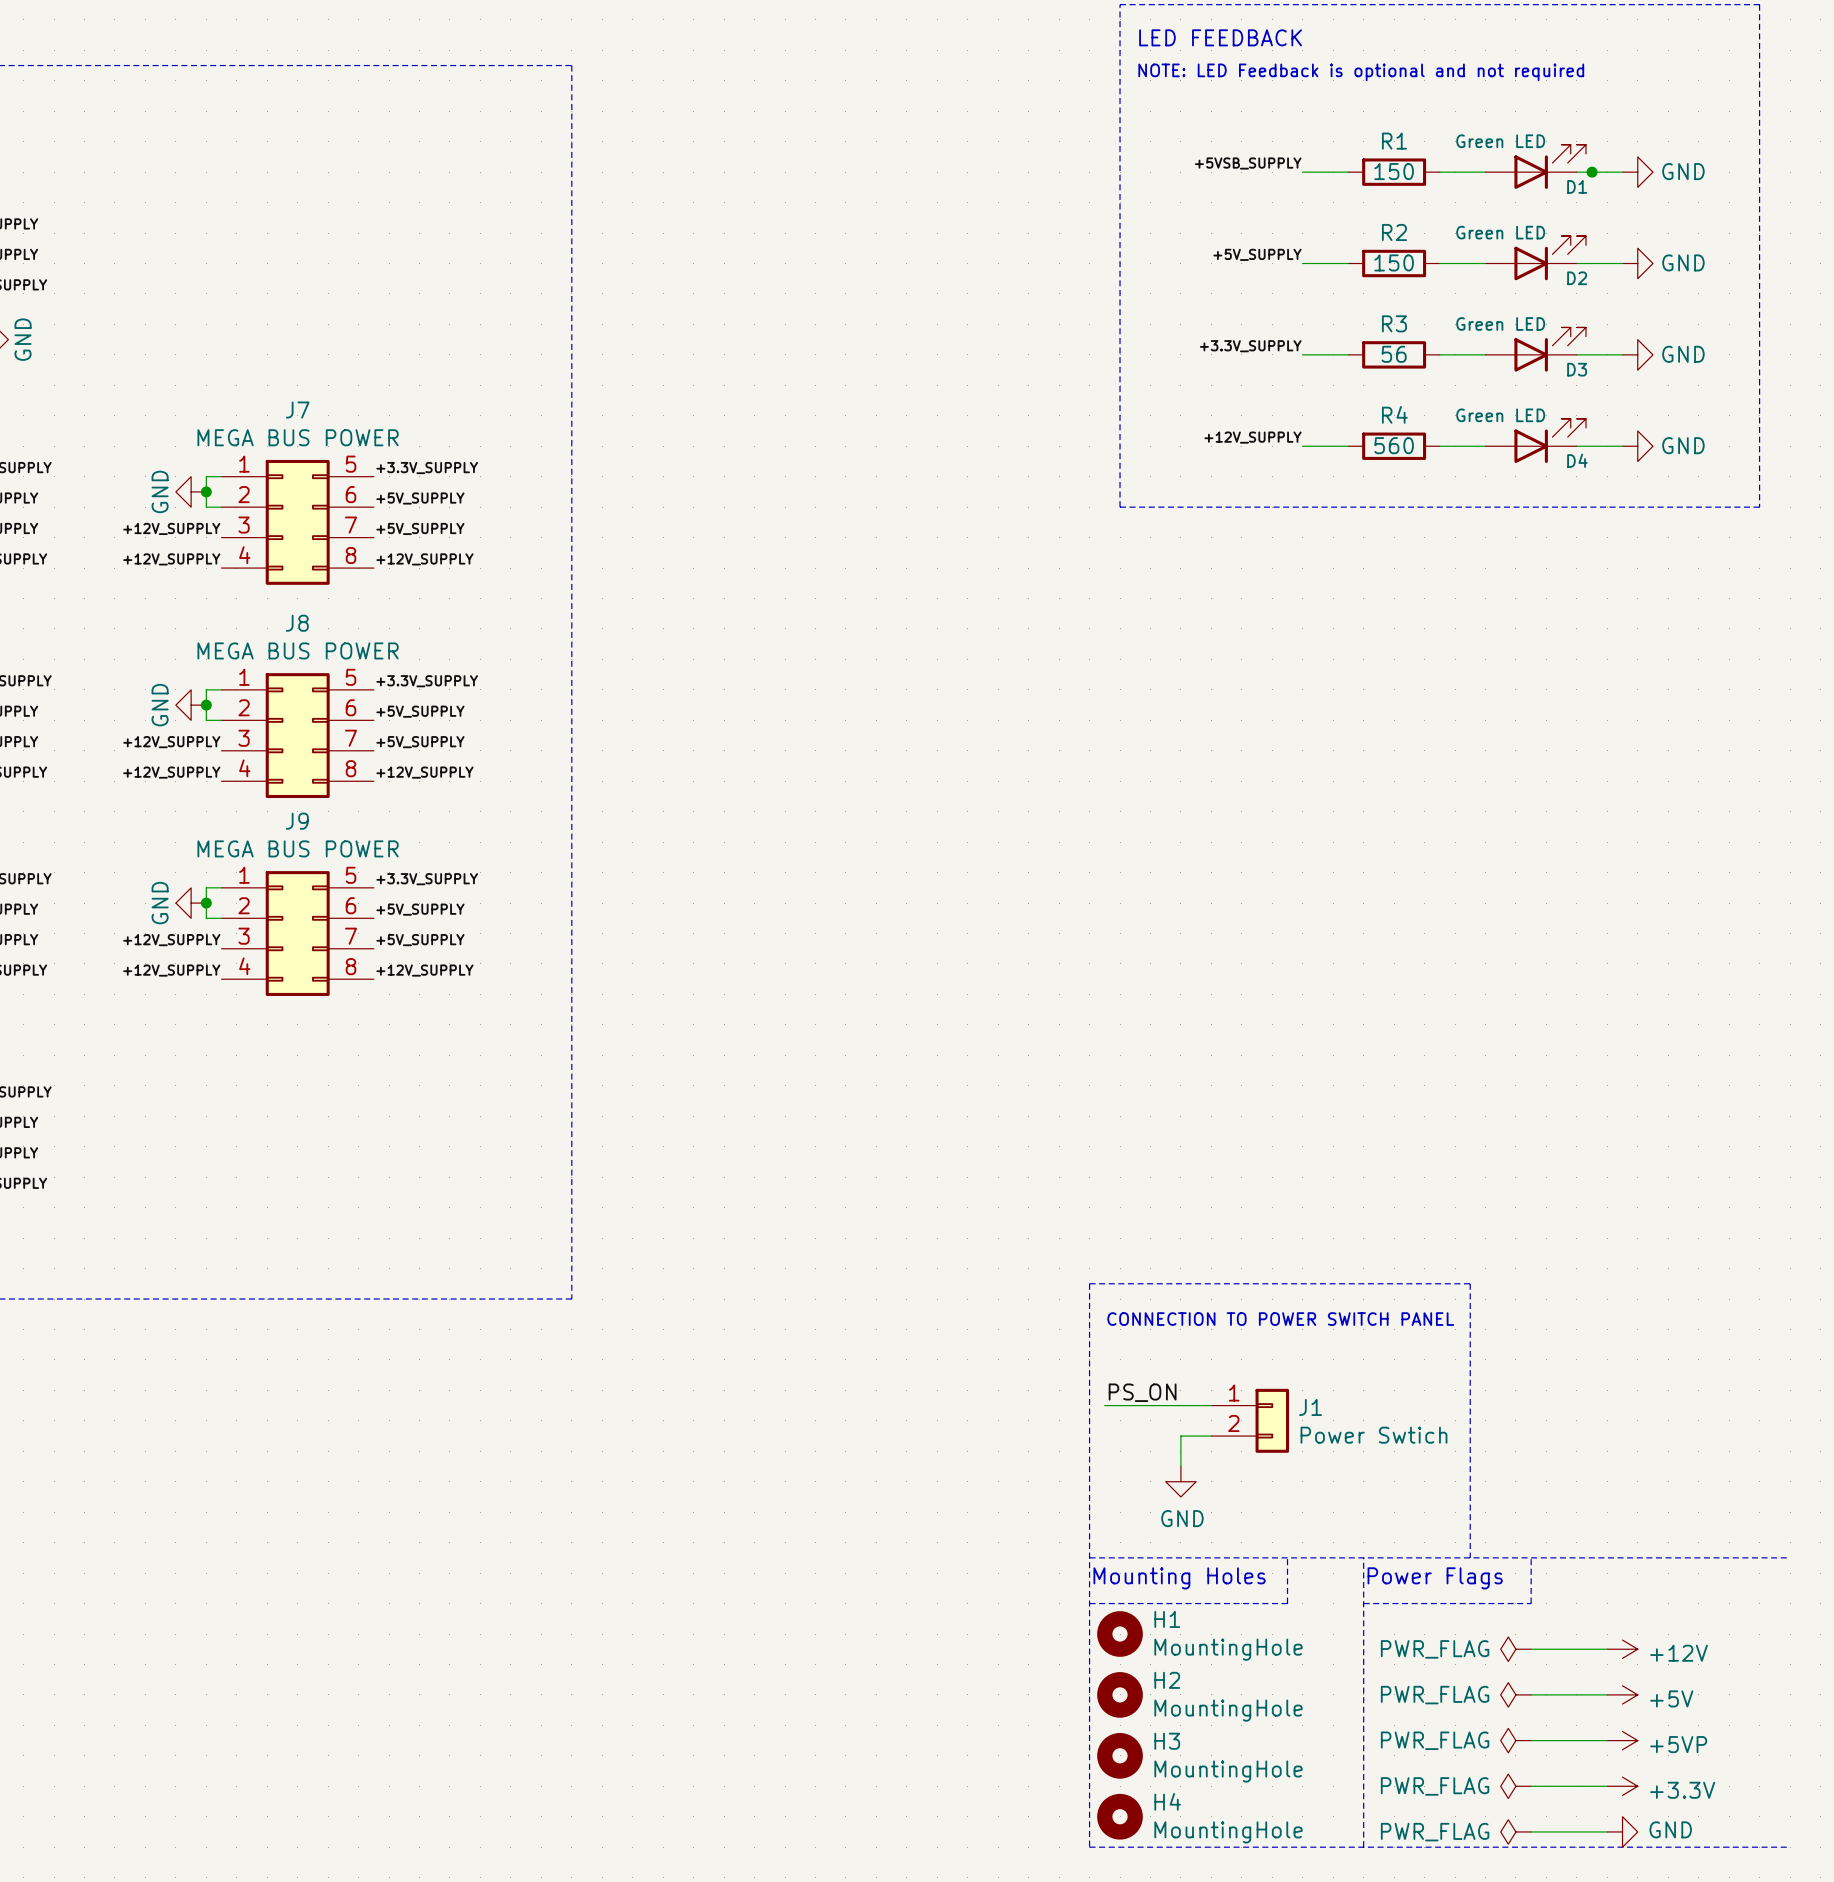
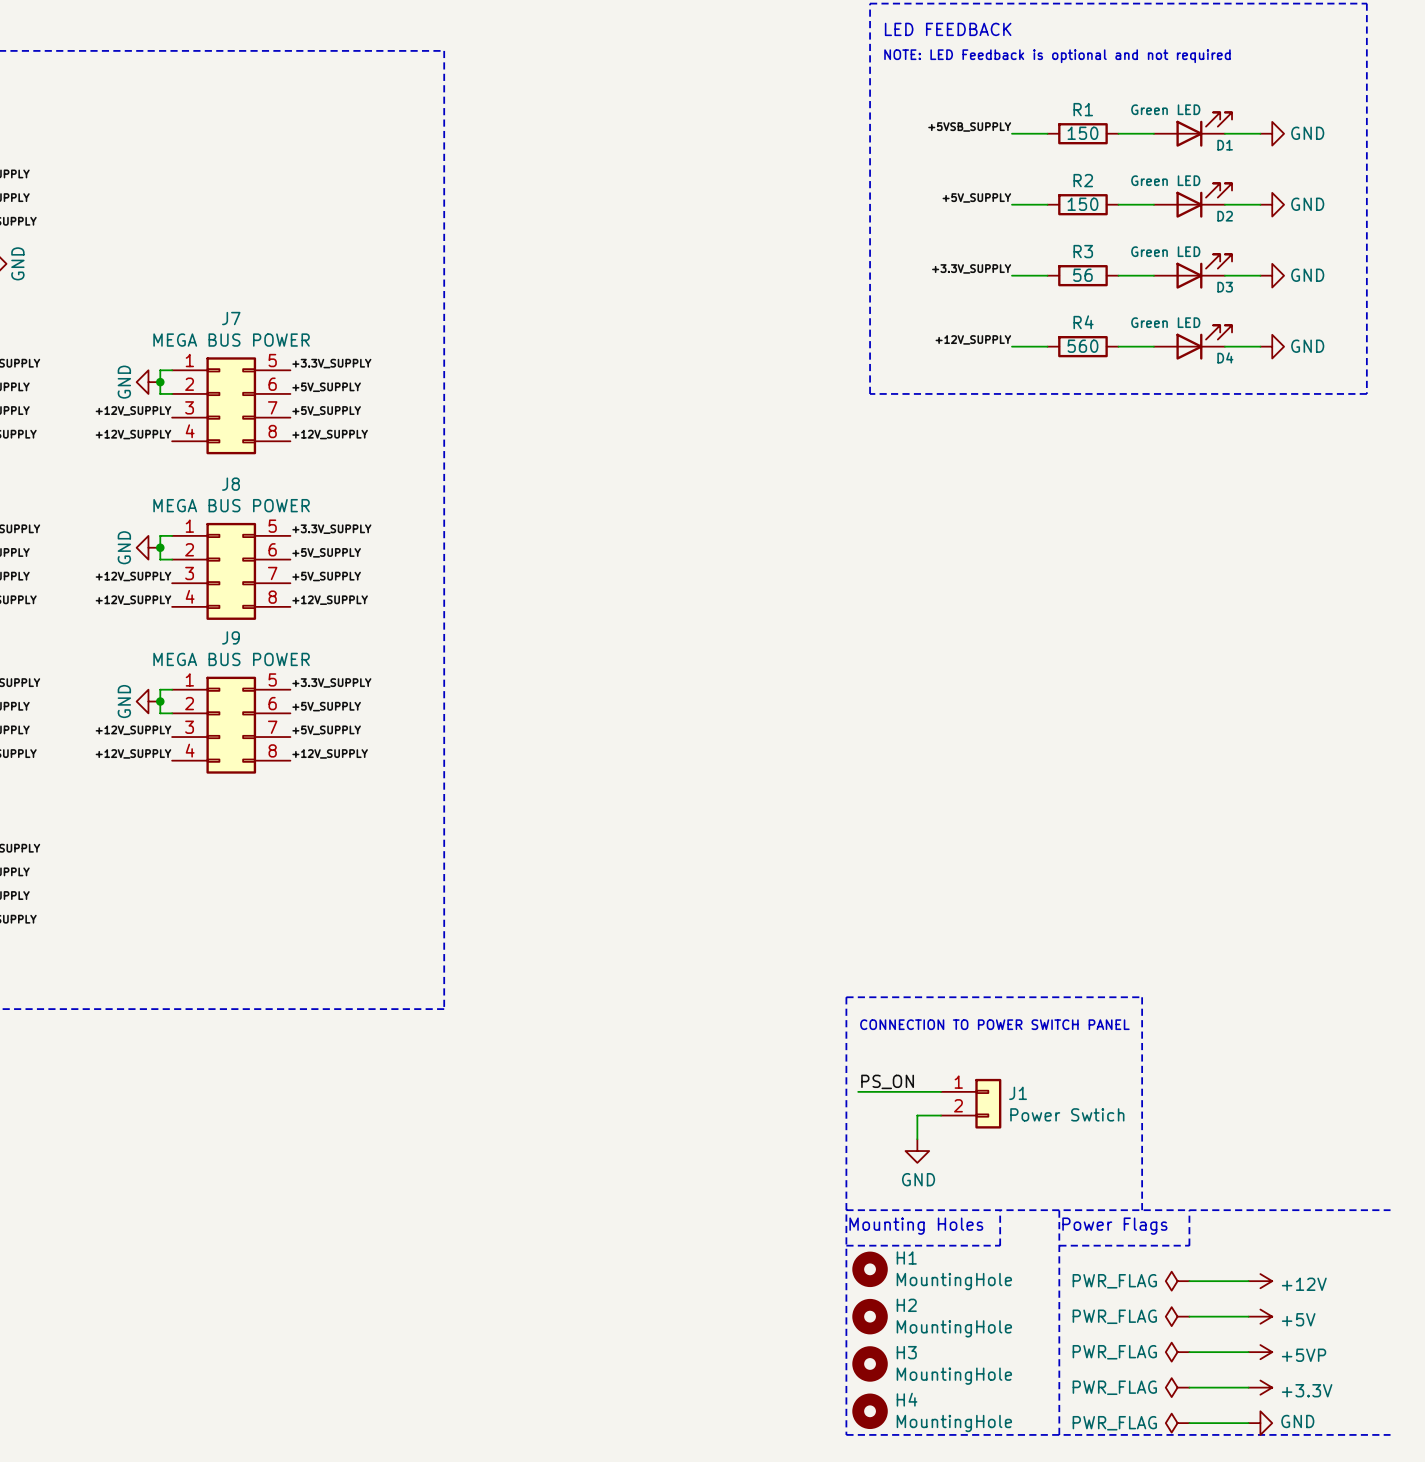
junction: (1592, 172) -> none

